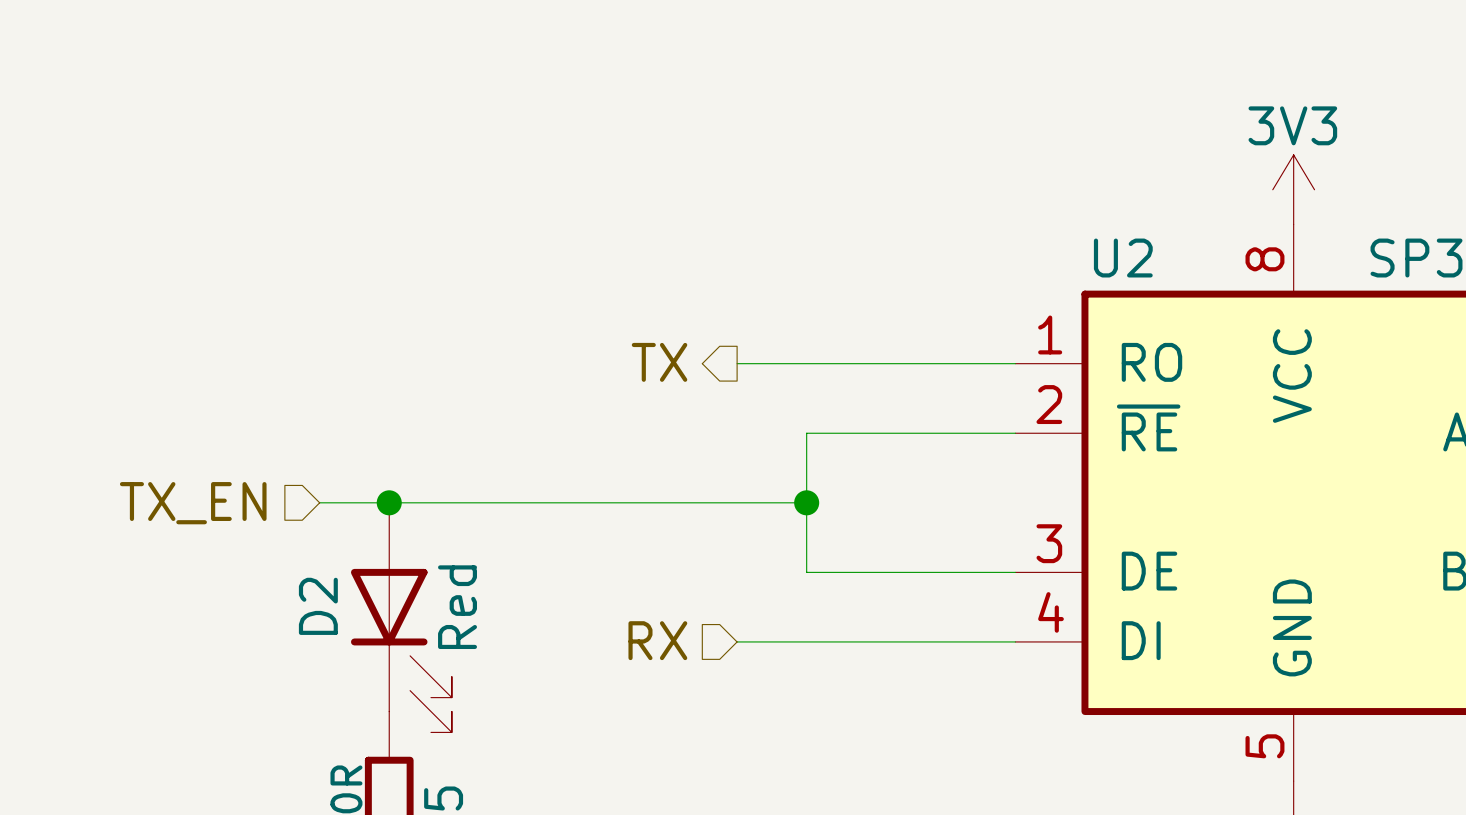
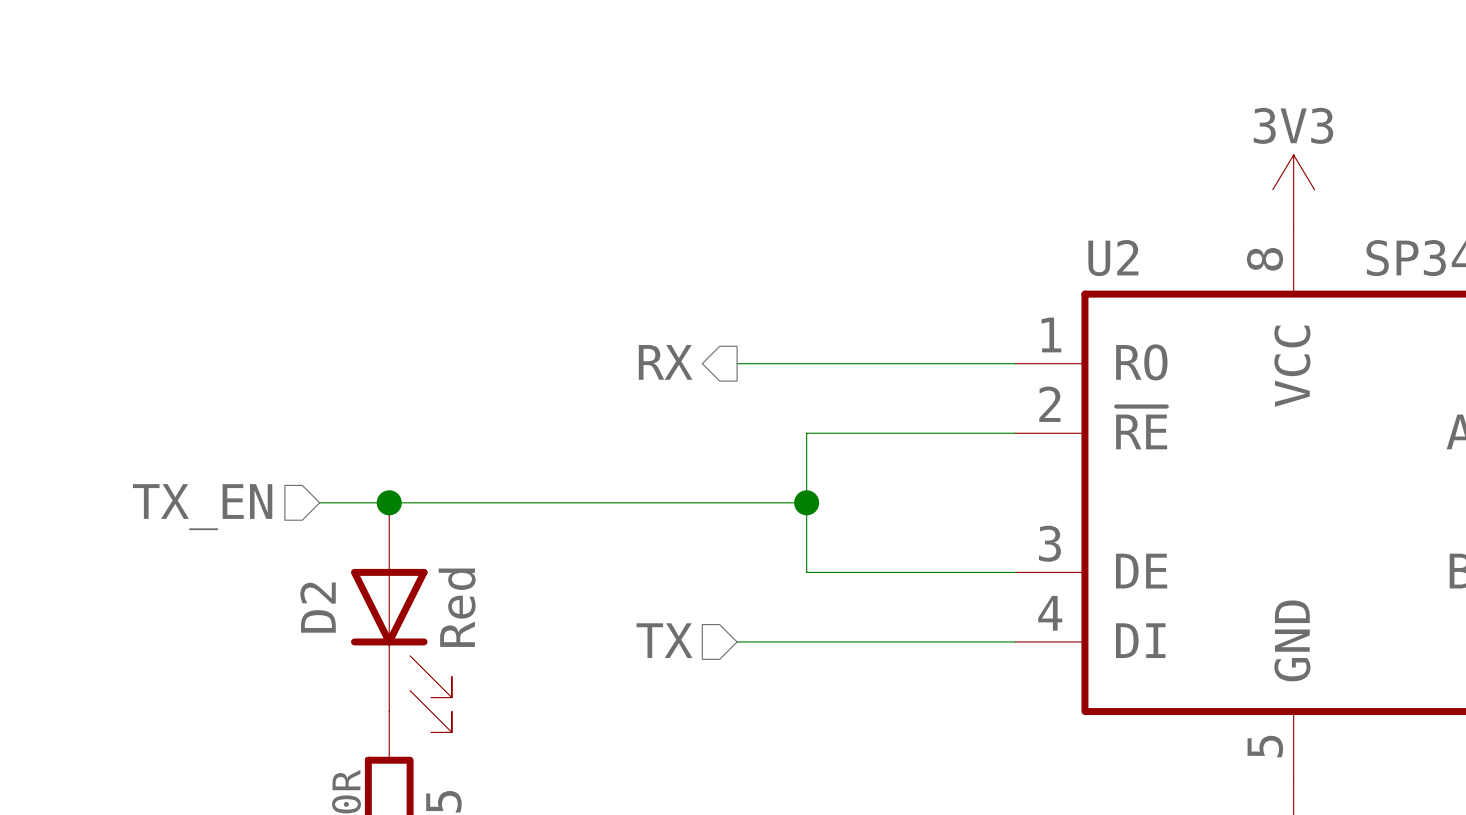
hierarchical label: TX (659, 362) -> RX (665, 362)
hierarchical label: RX (657, 640) -> TX (664, 640)

